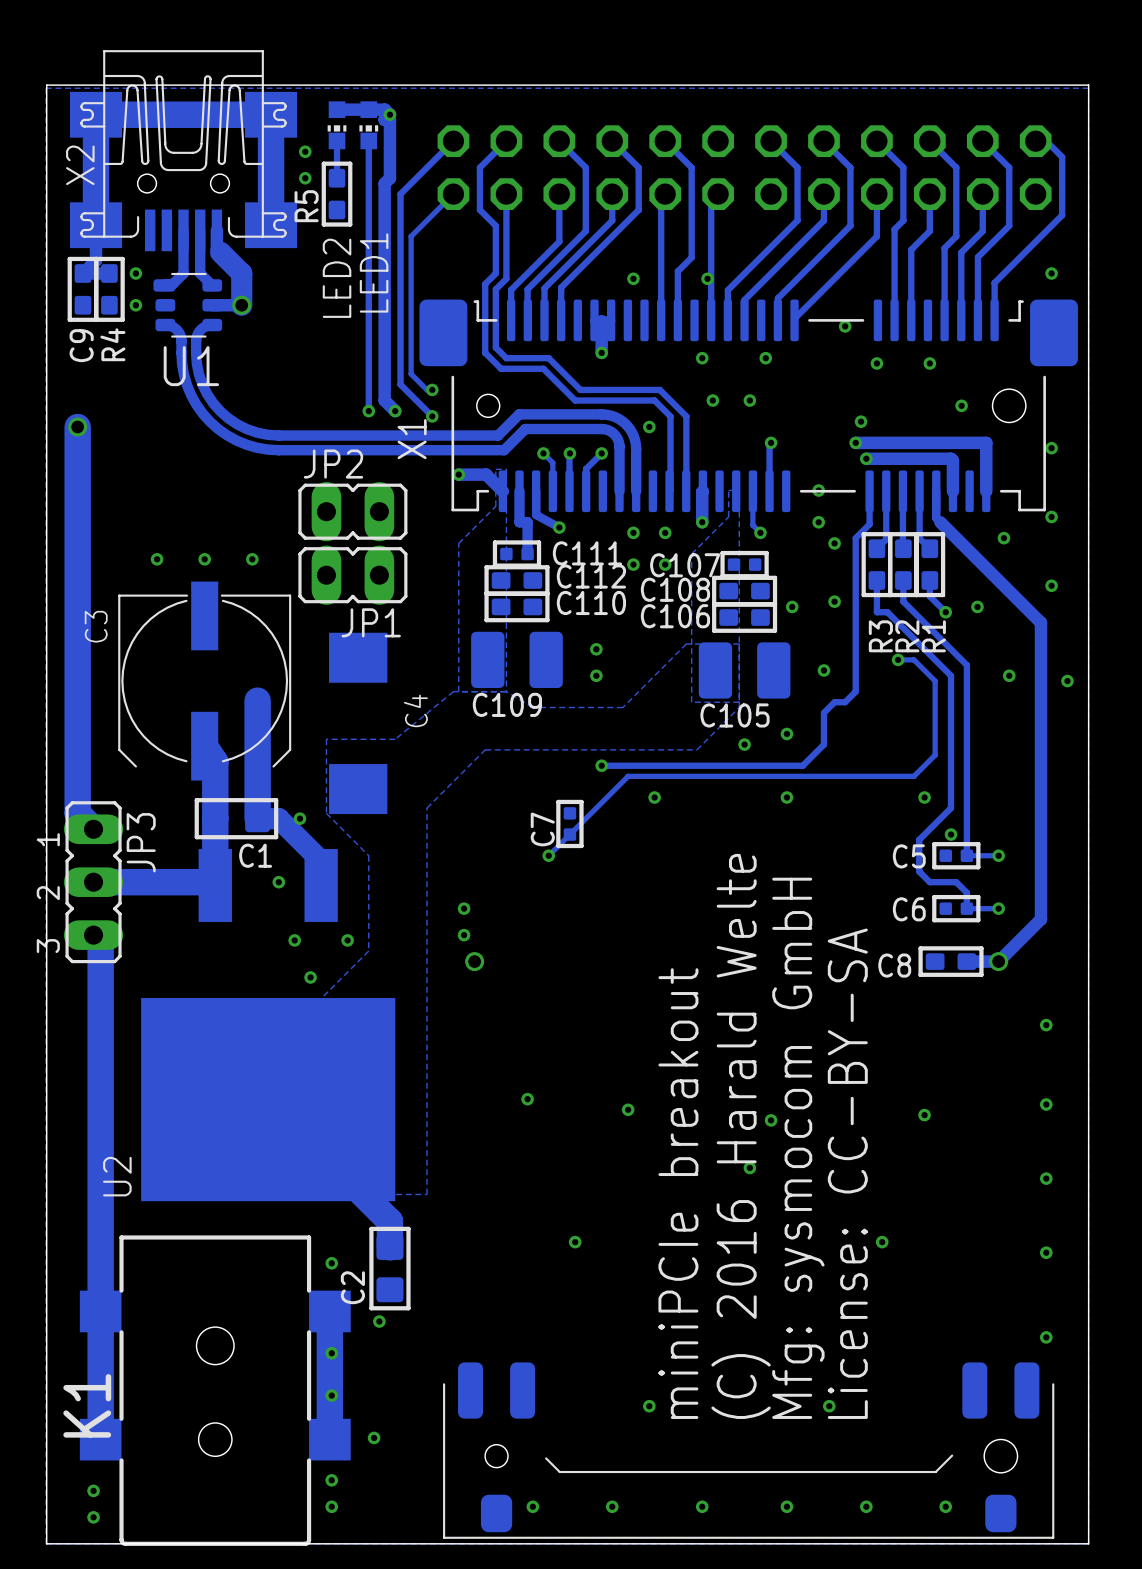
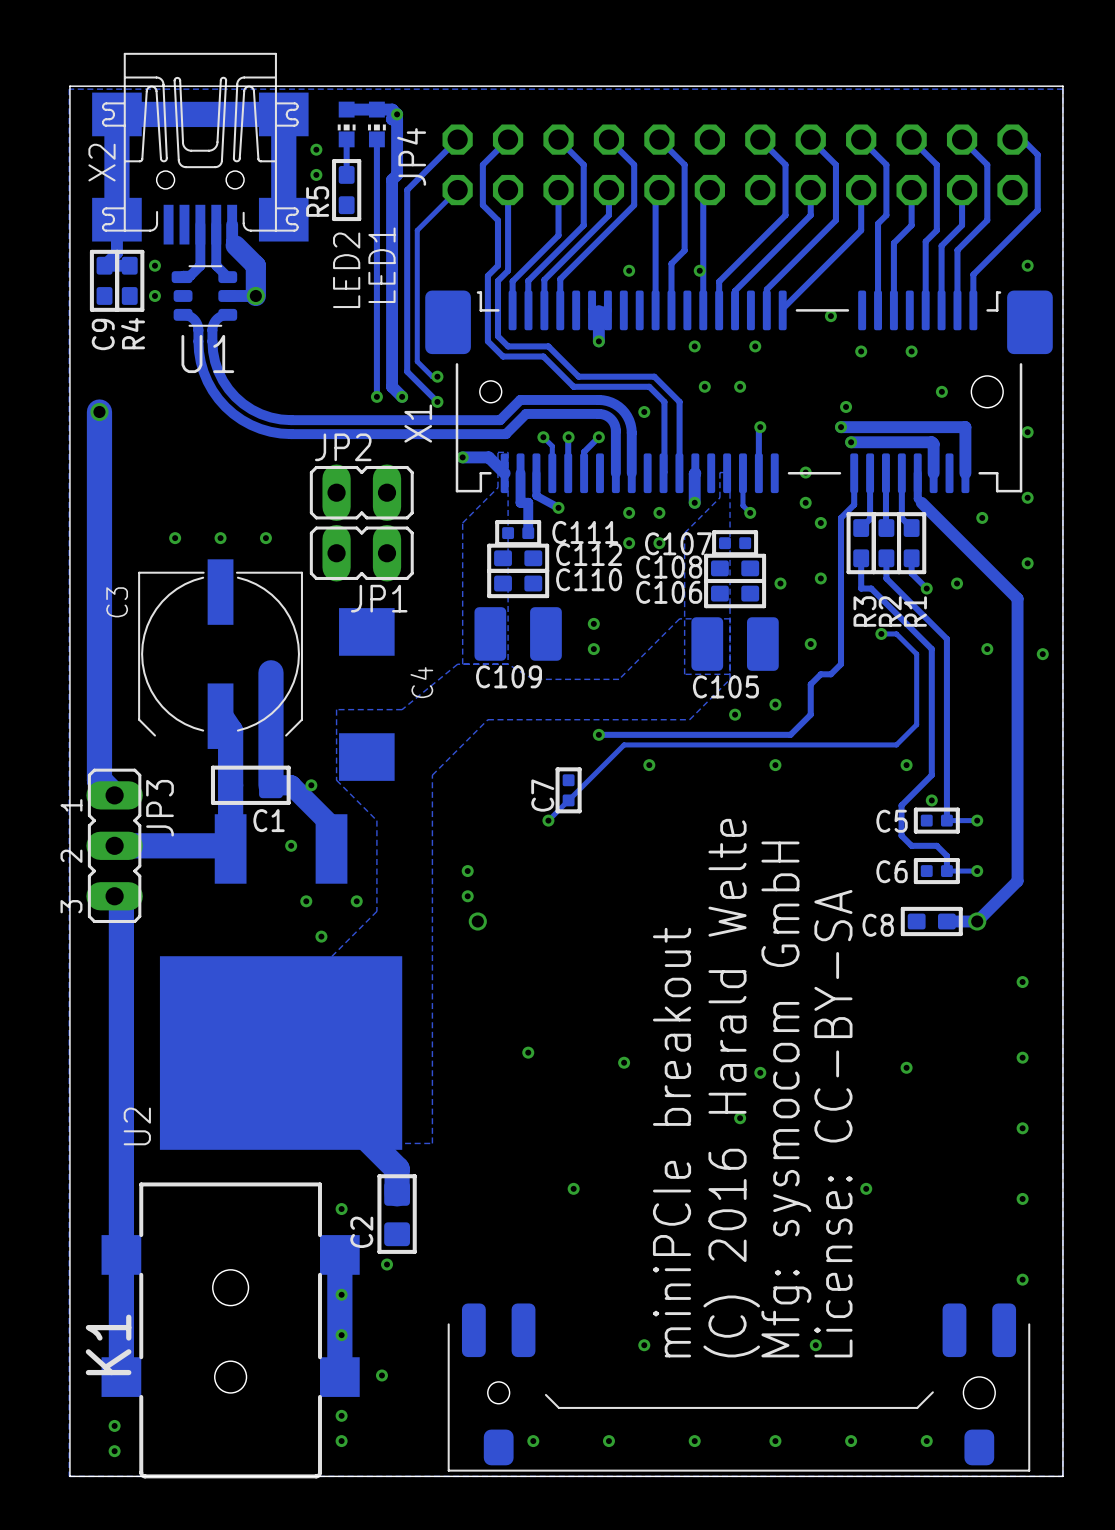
JP4 name: none -> JP4 (411, 156)

